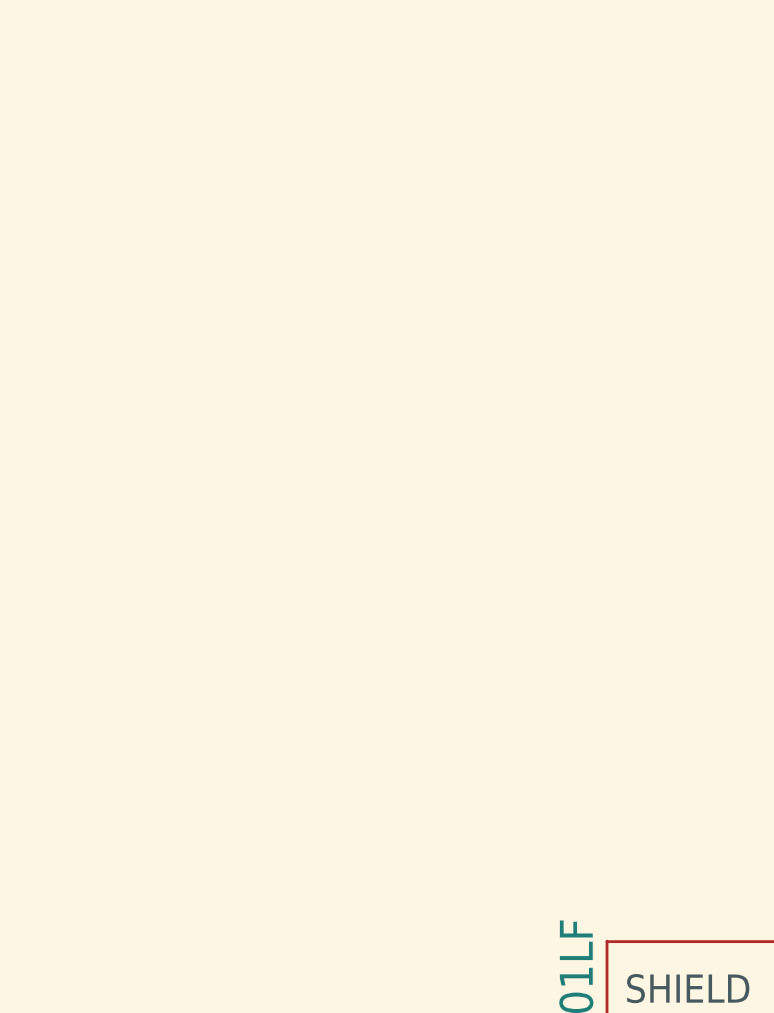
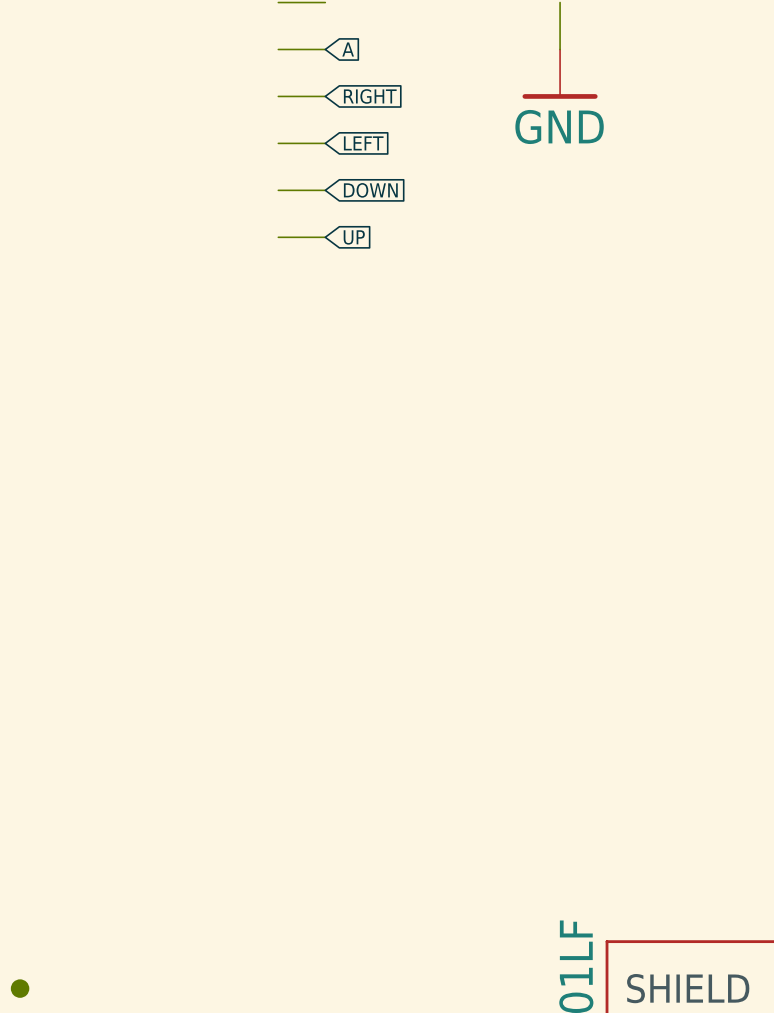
wire: none -> (278, 2) (325, 2)
wire: none -> (560, 2) (560, 49)
wire: none -> (278, 49) (325, 49)
global label: none -> A (348, 49)
power symbol: none -> GND (560, 74)
wire: none -> (278, 96) (325, 96)
global label: none -> RIGHT (370, 96)
wire: none -> (278, 143) (325, 143)
global label: none -> LEFT (363, 143)
wire: none -> (278, 190) (325, 190)
global label: none -> DOWN (370, 190)
wire: none -> (278, 237) (325, 237)
global label: none -> UP (354, 237)
junction: none -> (20, 988)

